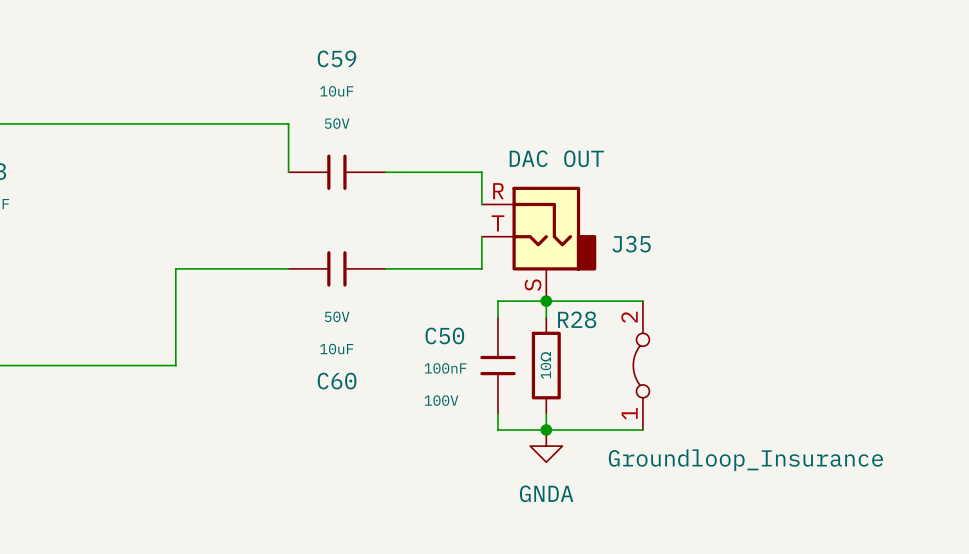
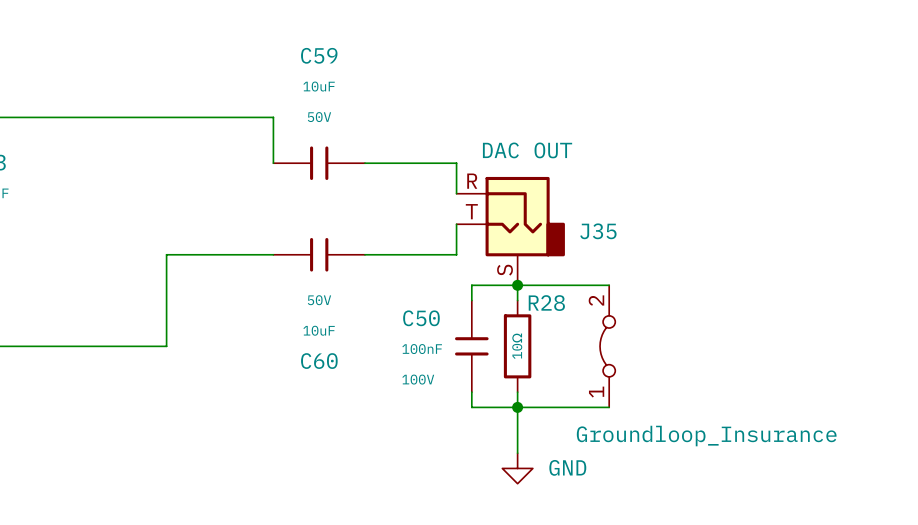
wire: none -> (517, 407) (517, 453)
power symbol: GNDA (546, 446) -> none
power symbol: none -> GND (517, 468)

